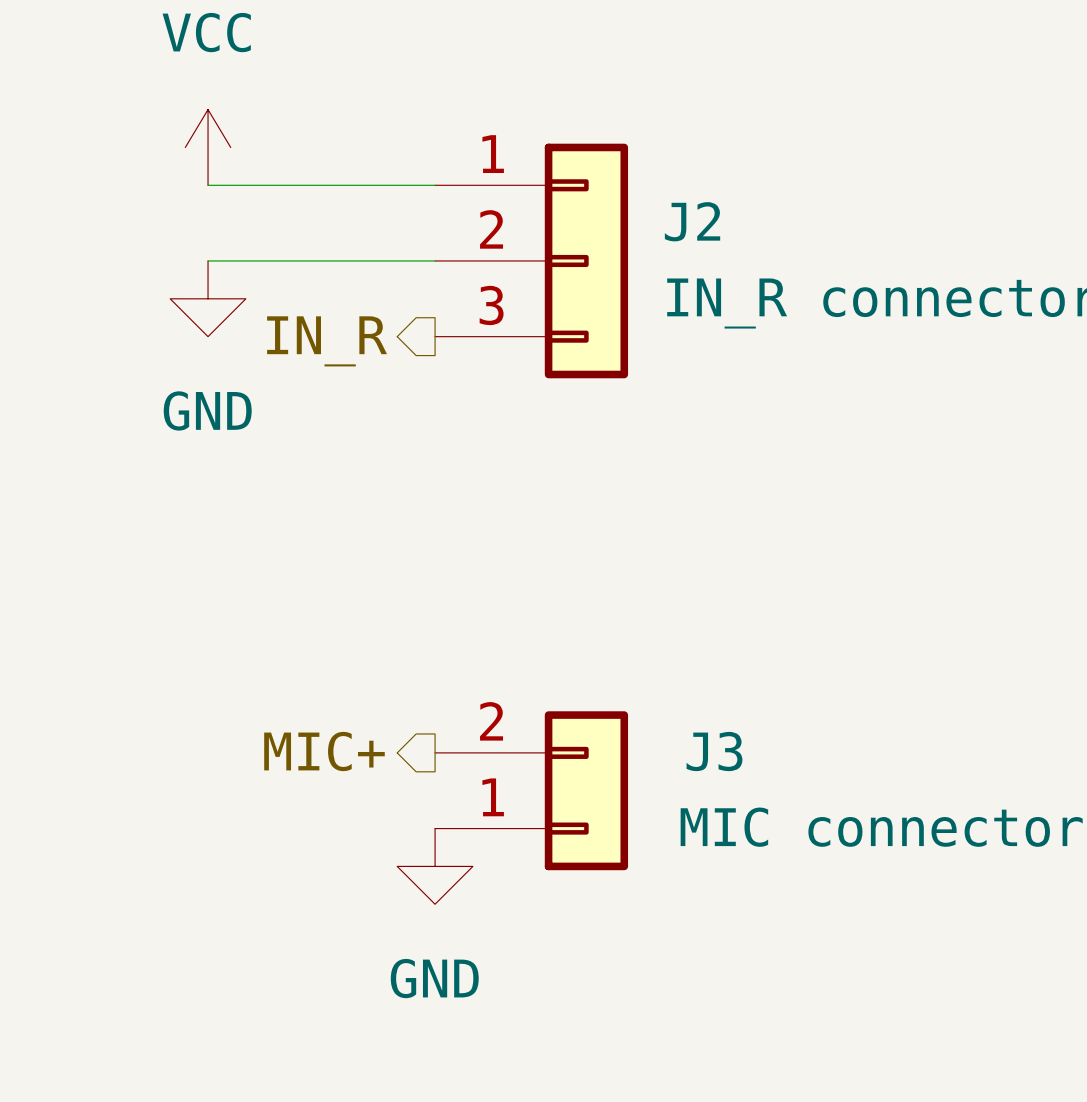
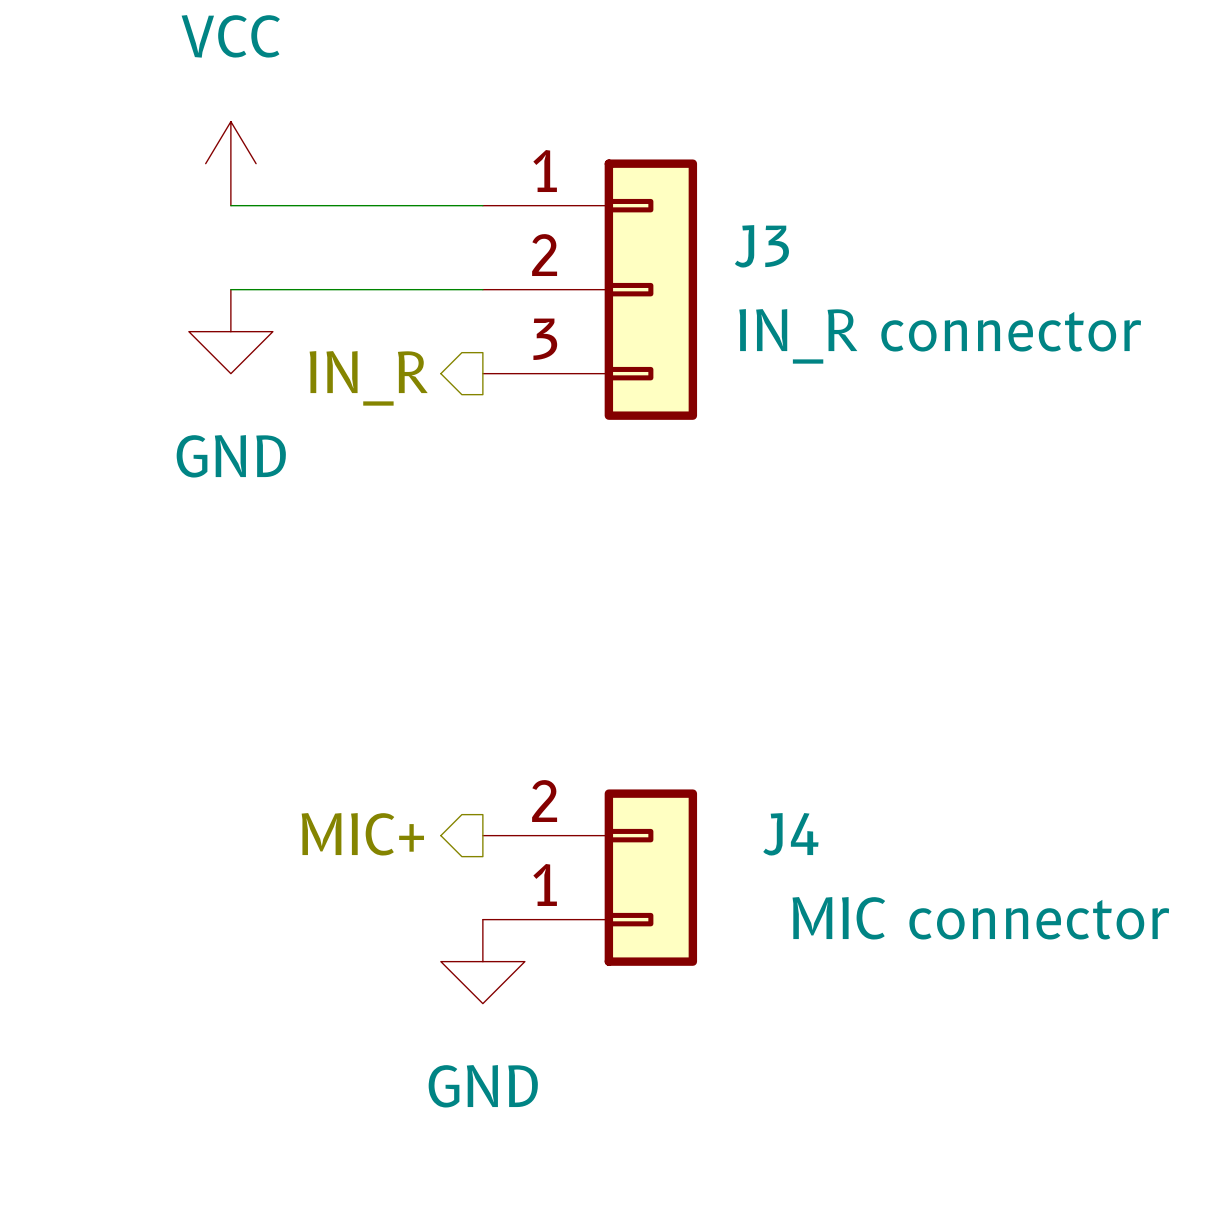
J2 name: J2 (692, 221) -> J3 (761, 246)
J3 name: J3 (714, 751) -> J4 (790, 834)

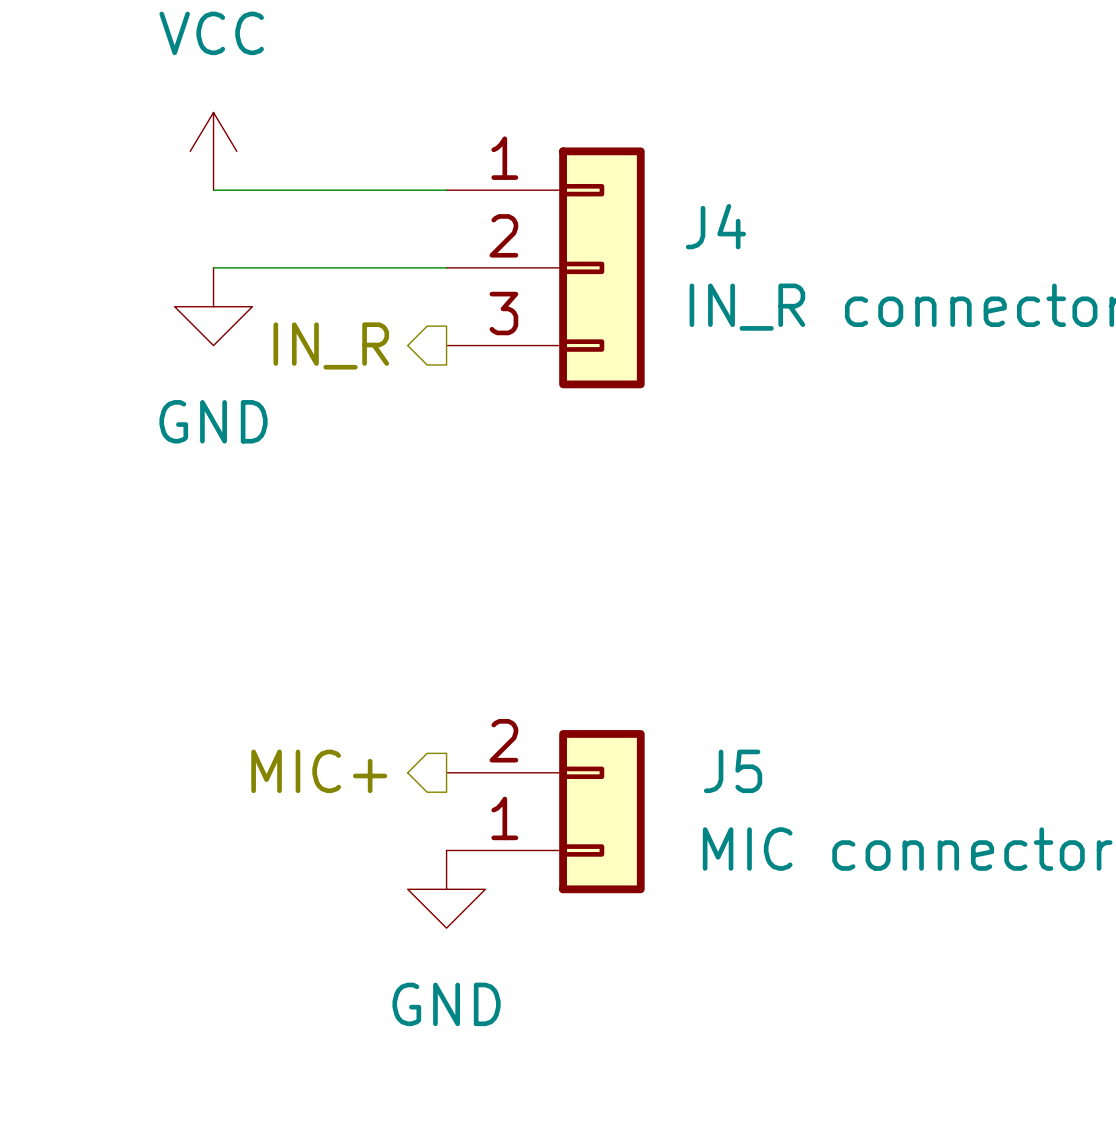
J3 name: J3 (761, 246) -> J4 (715, 226)
J4 name: J4 (790, 834) -> J5 (733, 771)

